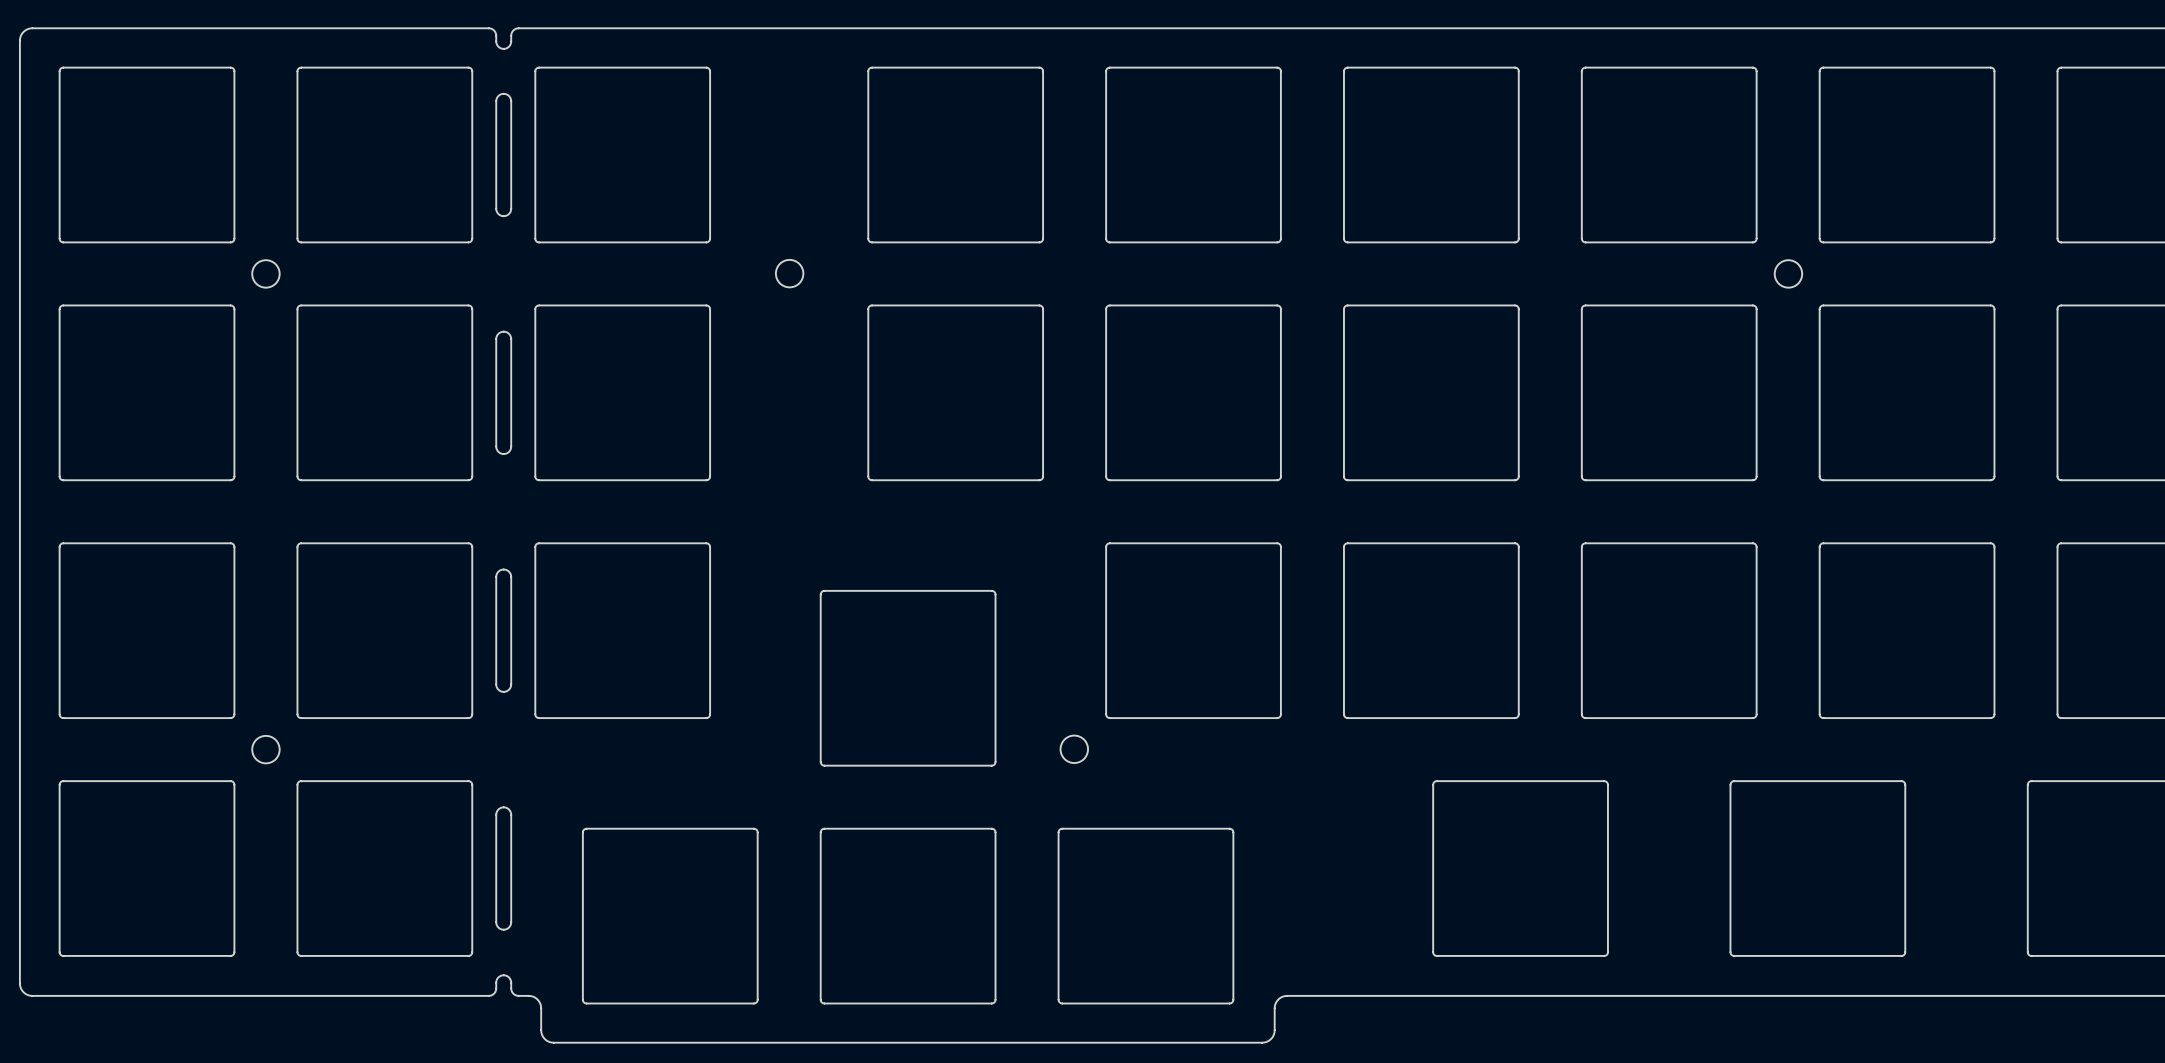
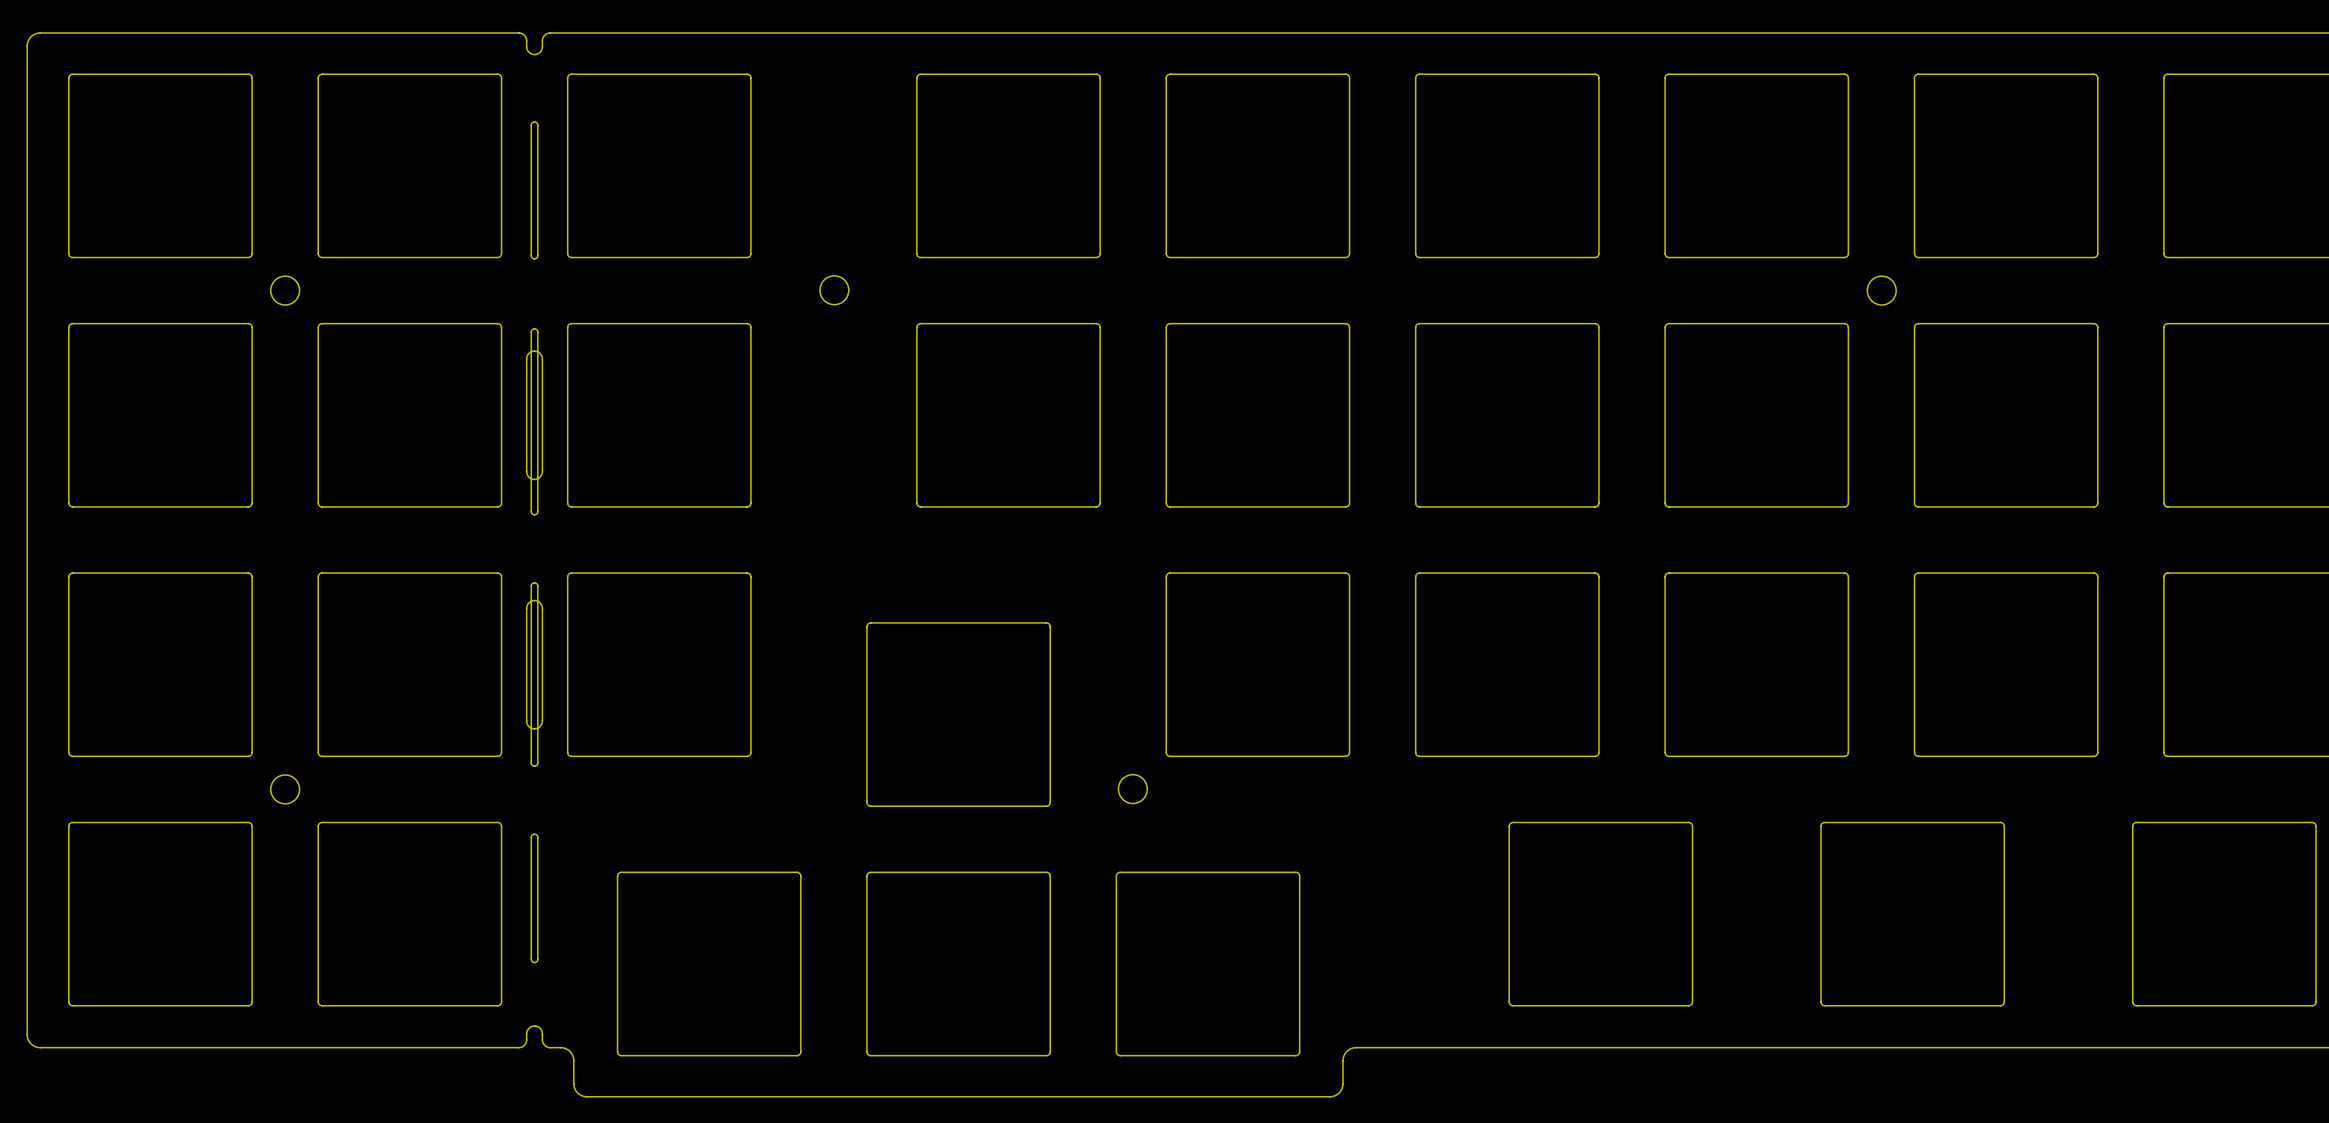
board edge: (503, 93) (498, 96) (496, 101) (496, 208) (498, 213) (503, 216) (509, 213) (511, 208) (511, 101) (509, 96) (503, 93) -> none
board edge: none -> (534, 122) (531, 125) (531, 255) (534, 258) (537, 255) (537, 125) (534, 122)
board edge: none -> (534, 328) (537, 332) (537, 511) (534, 514) (531, 511) (531, 332) (534, 328)
board edge: none -> (534, 582) (531, 586) (531, 762) (534, 766) (537, 762) (537, 586) (534, 582)
board edge: none -> (534, 834) (537, 837) (537, 959) (534, 962) (531, 959) (531, 837) (534, 834)
board edge: (503, 807) (509, 809) (511, 814) (511, 922) (509, 927) (503, 929) (498, 927) (496, 922) (496, 814) (498, 809) (503, 807) -> none

